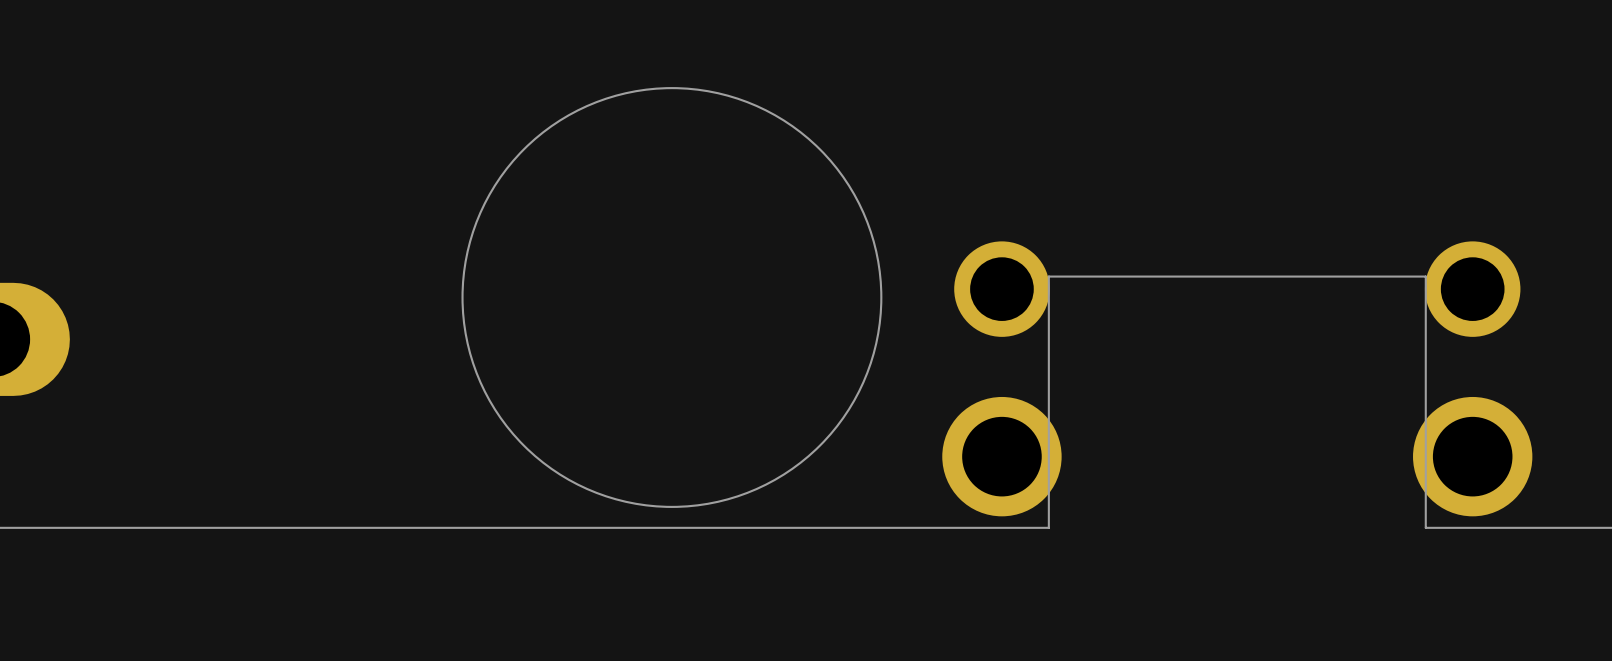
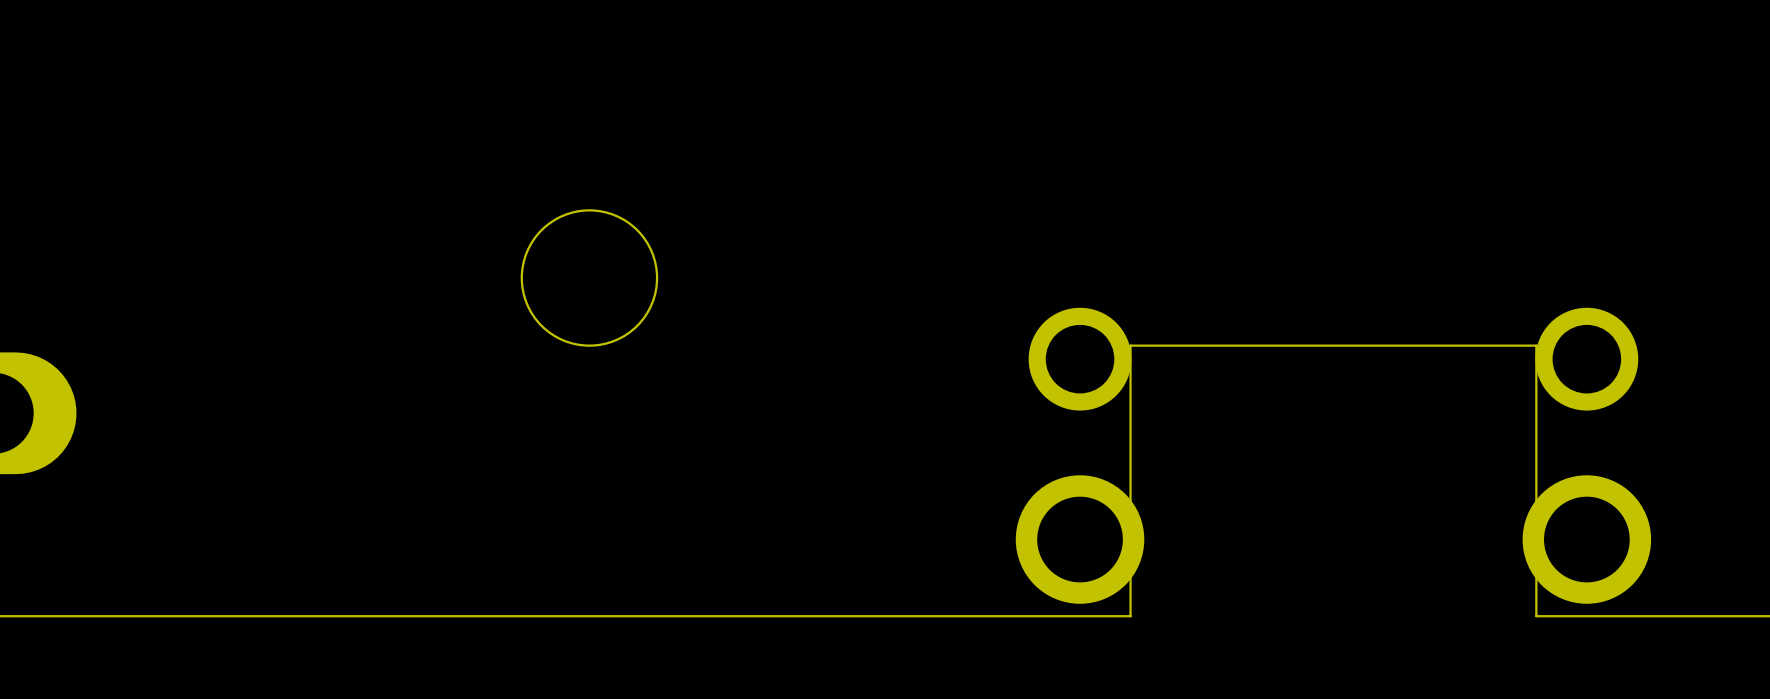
round board edge: [461, 87, 883, 508] -> none
round board edge: none -> [520, 209, 659, 347]

